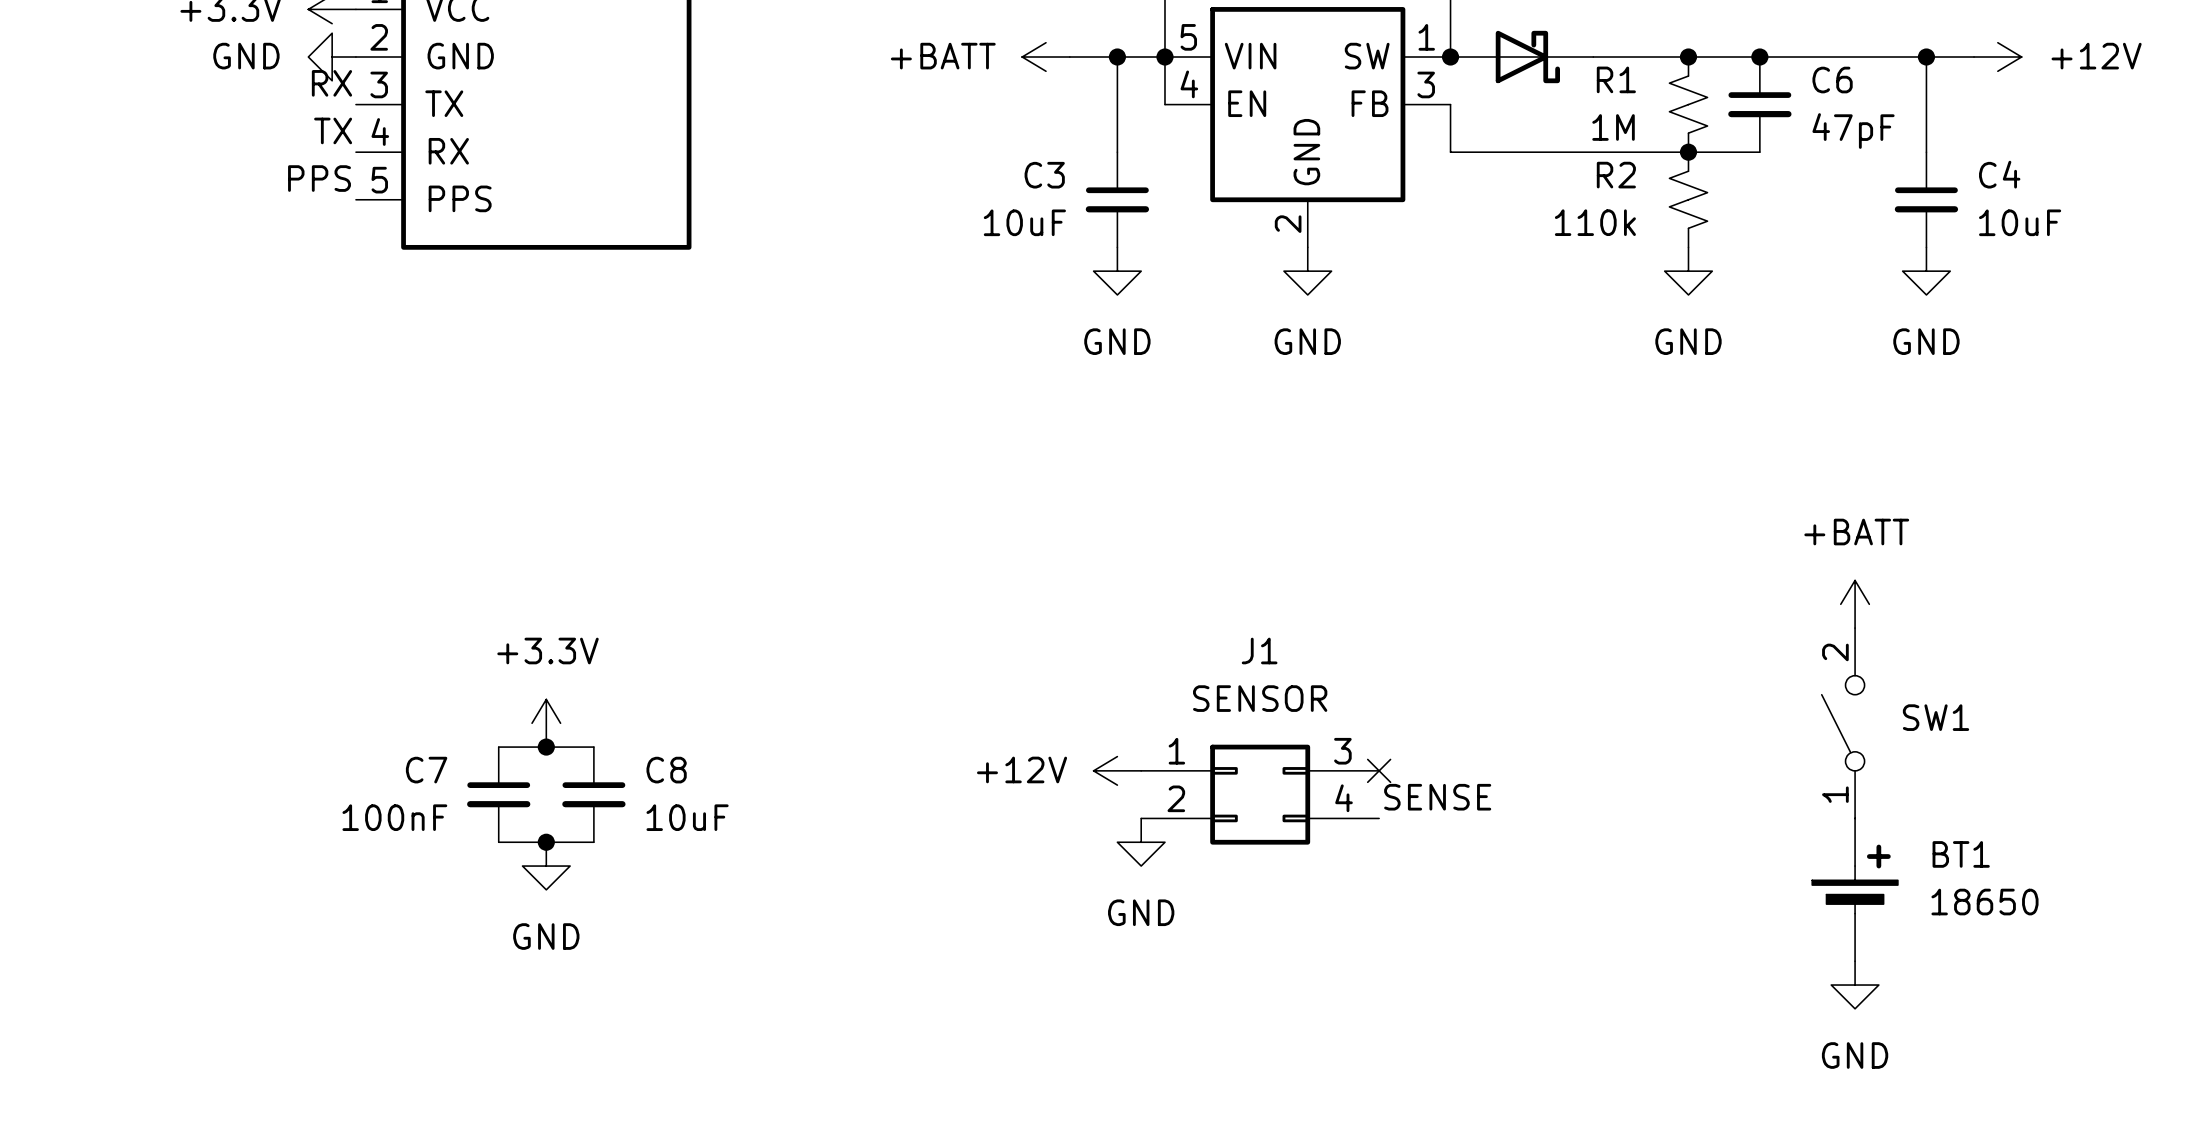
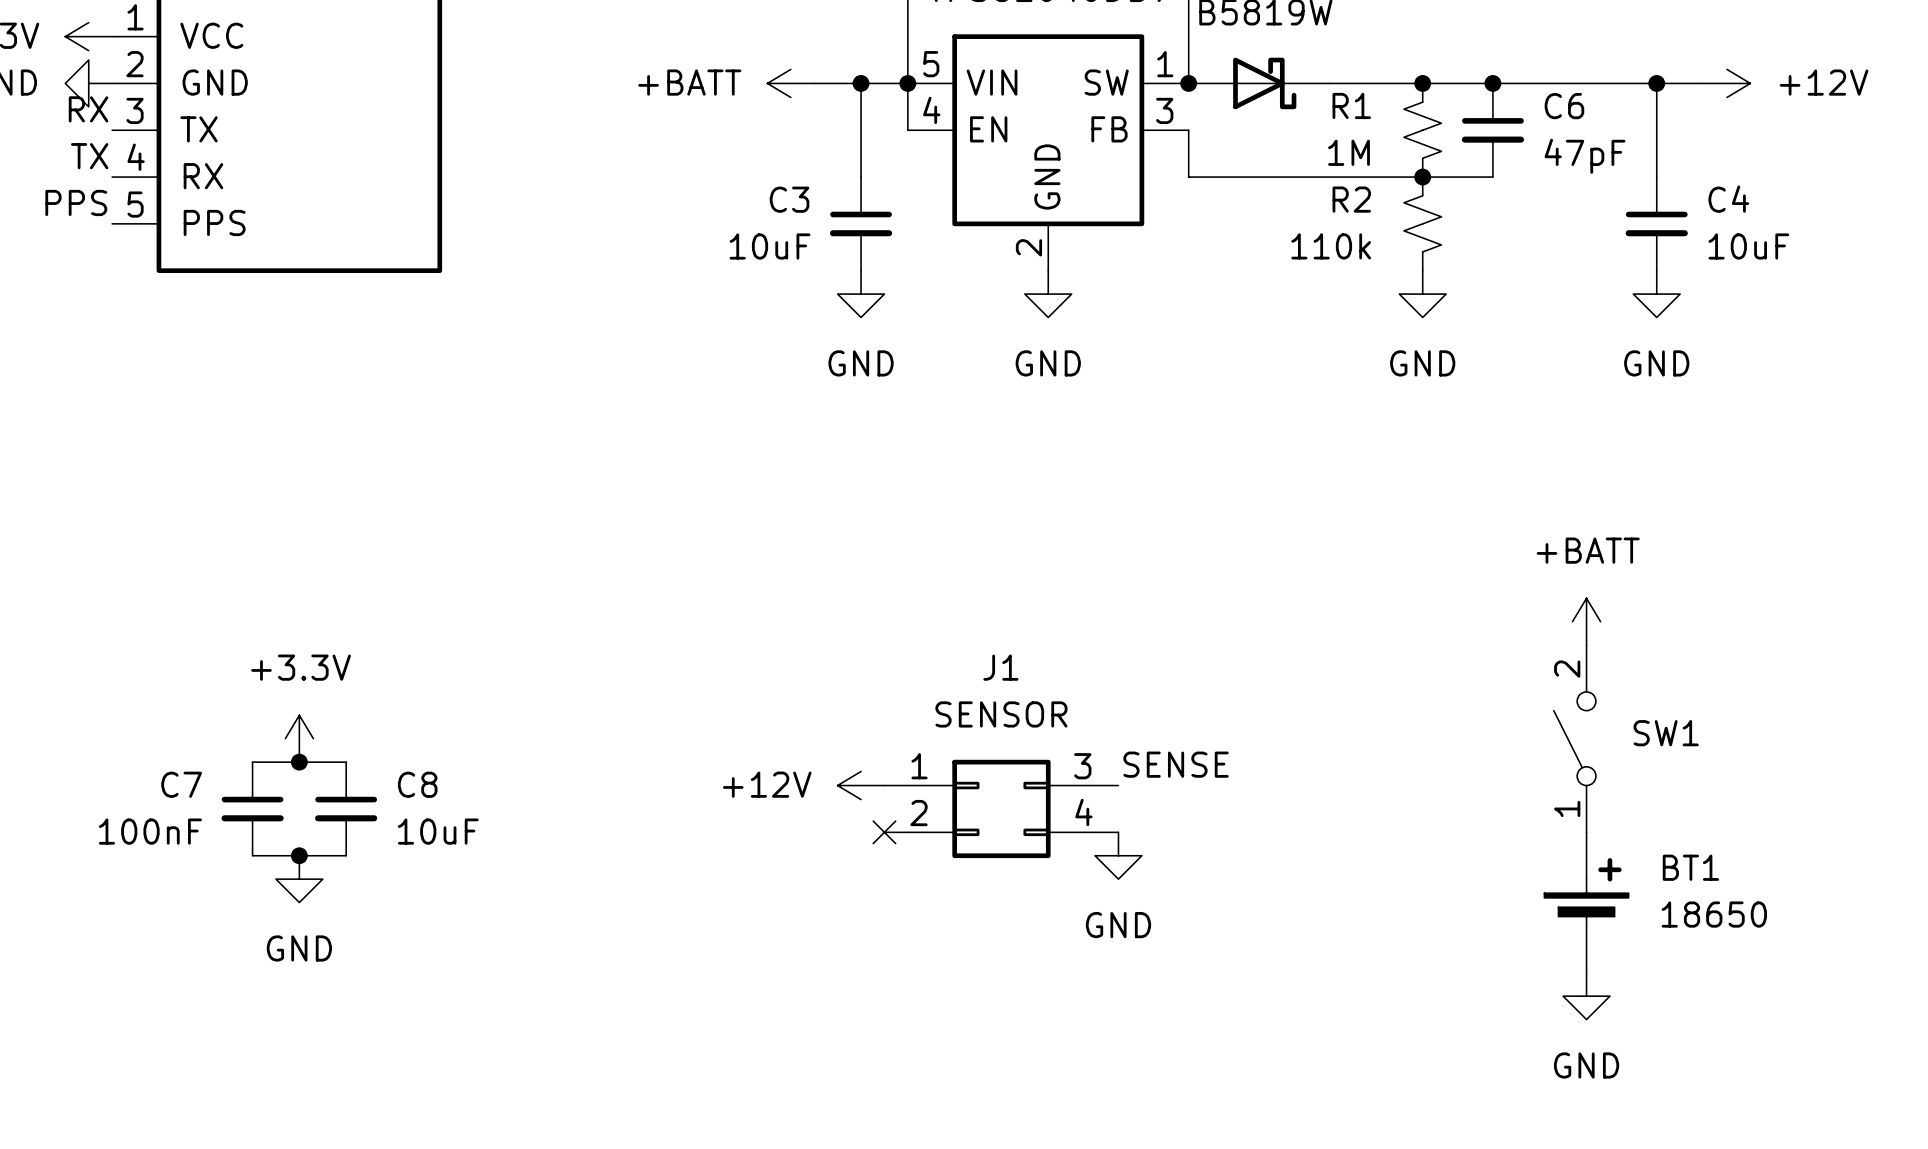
no-connect mark: (1379, 770) -> none
label position: SENSE (1437, 797) -> SENSE (1176, 764)
no-connect mark: none -> (884, 832)
power symbol position: GND (1141, 842) -> GND (1118, 855)

